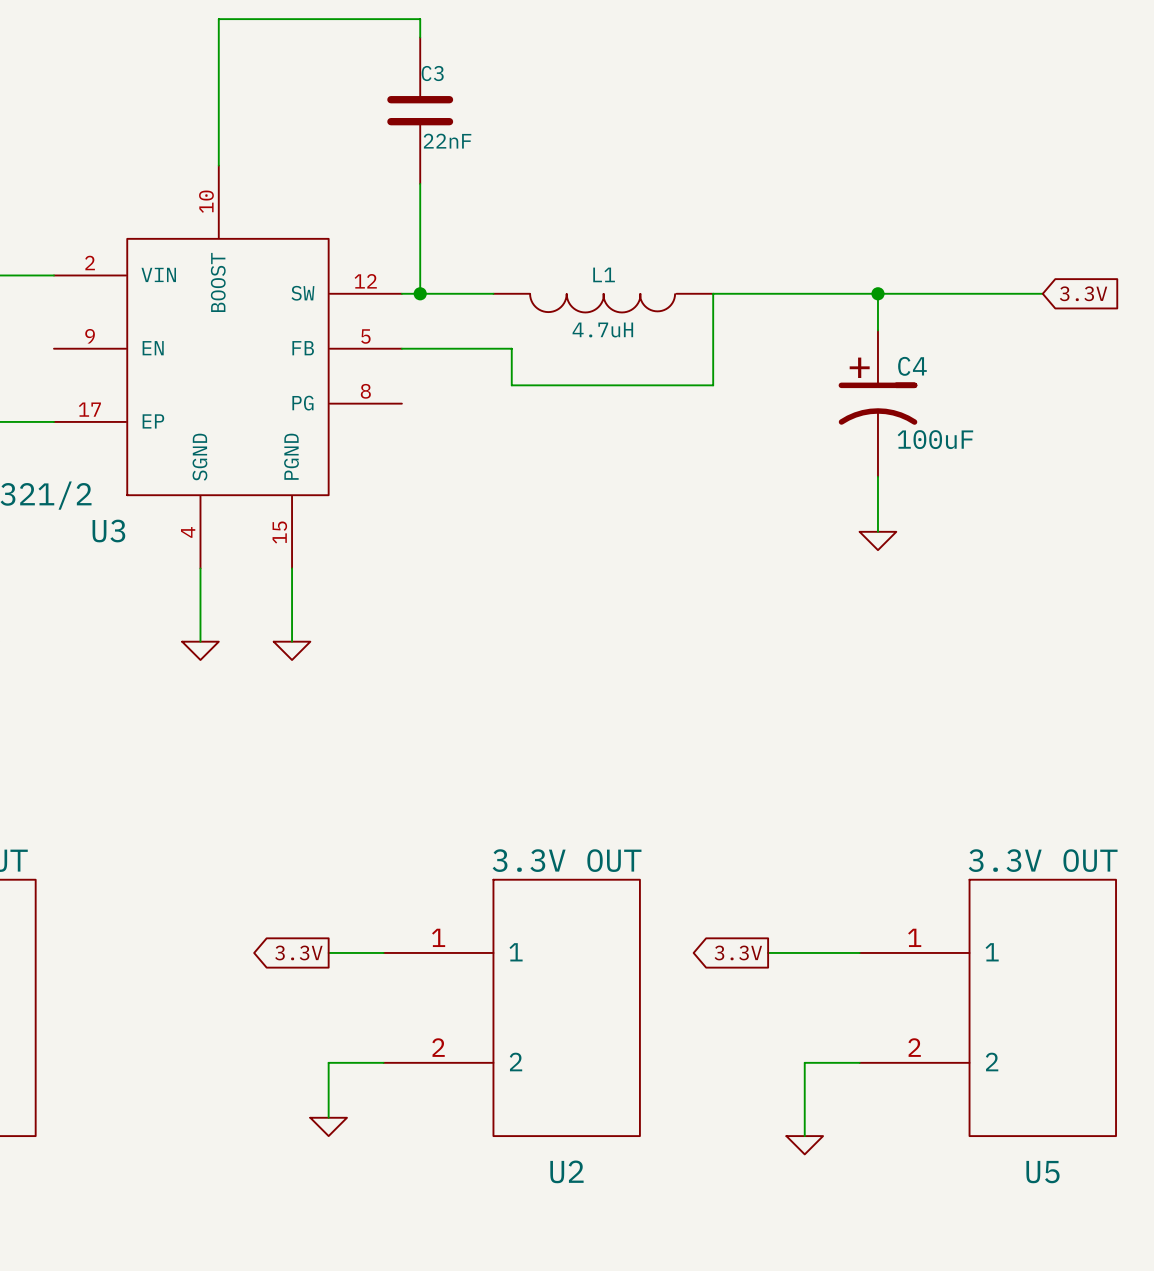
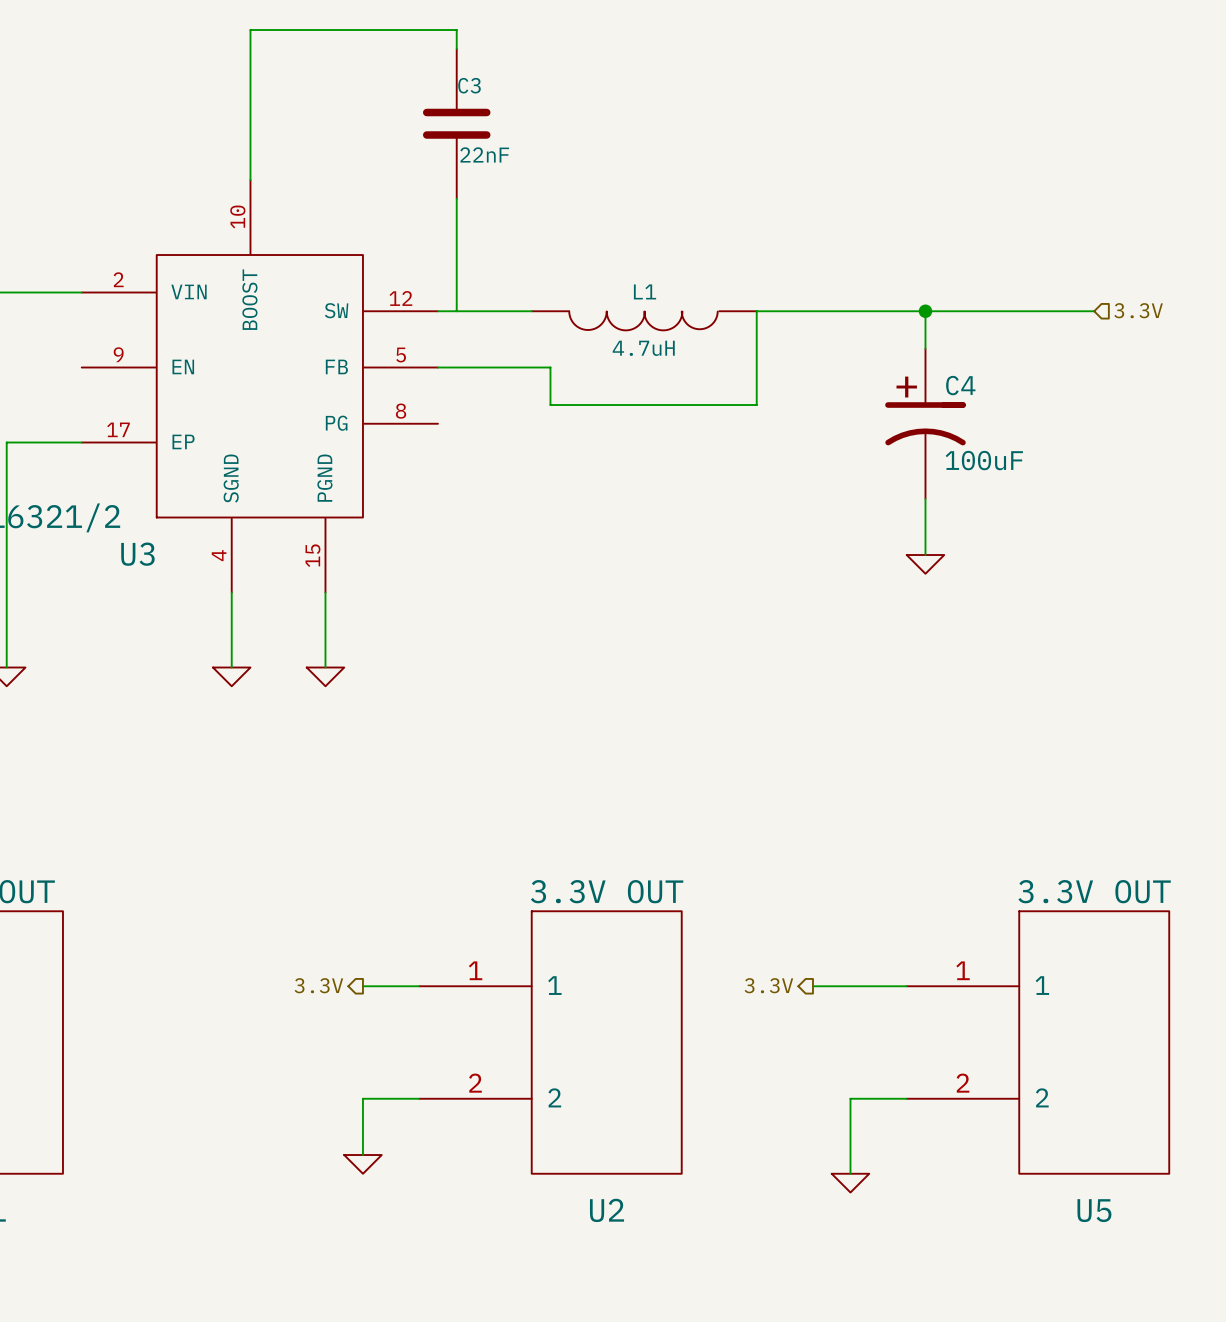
junction: (420, 293) -> none
global label: 3.3V (1083, 293) -> none
hierarchical label: none -> 3.3V (1138, 310)
hierarchical label: none -> 3.3V (318, 985)
global label: 3.3V (298, 952) -> none
hierarchical label: none -> 3.3V (768, 985)
global label: 3.3V (738, 952) -> none

